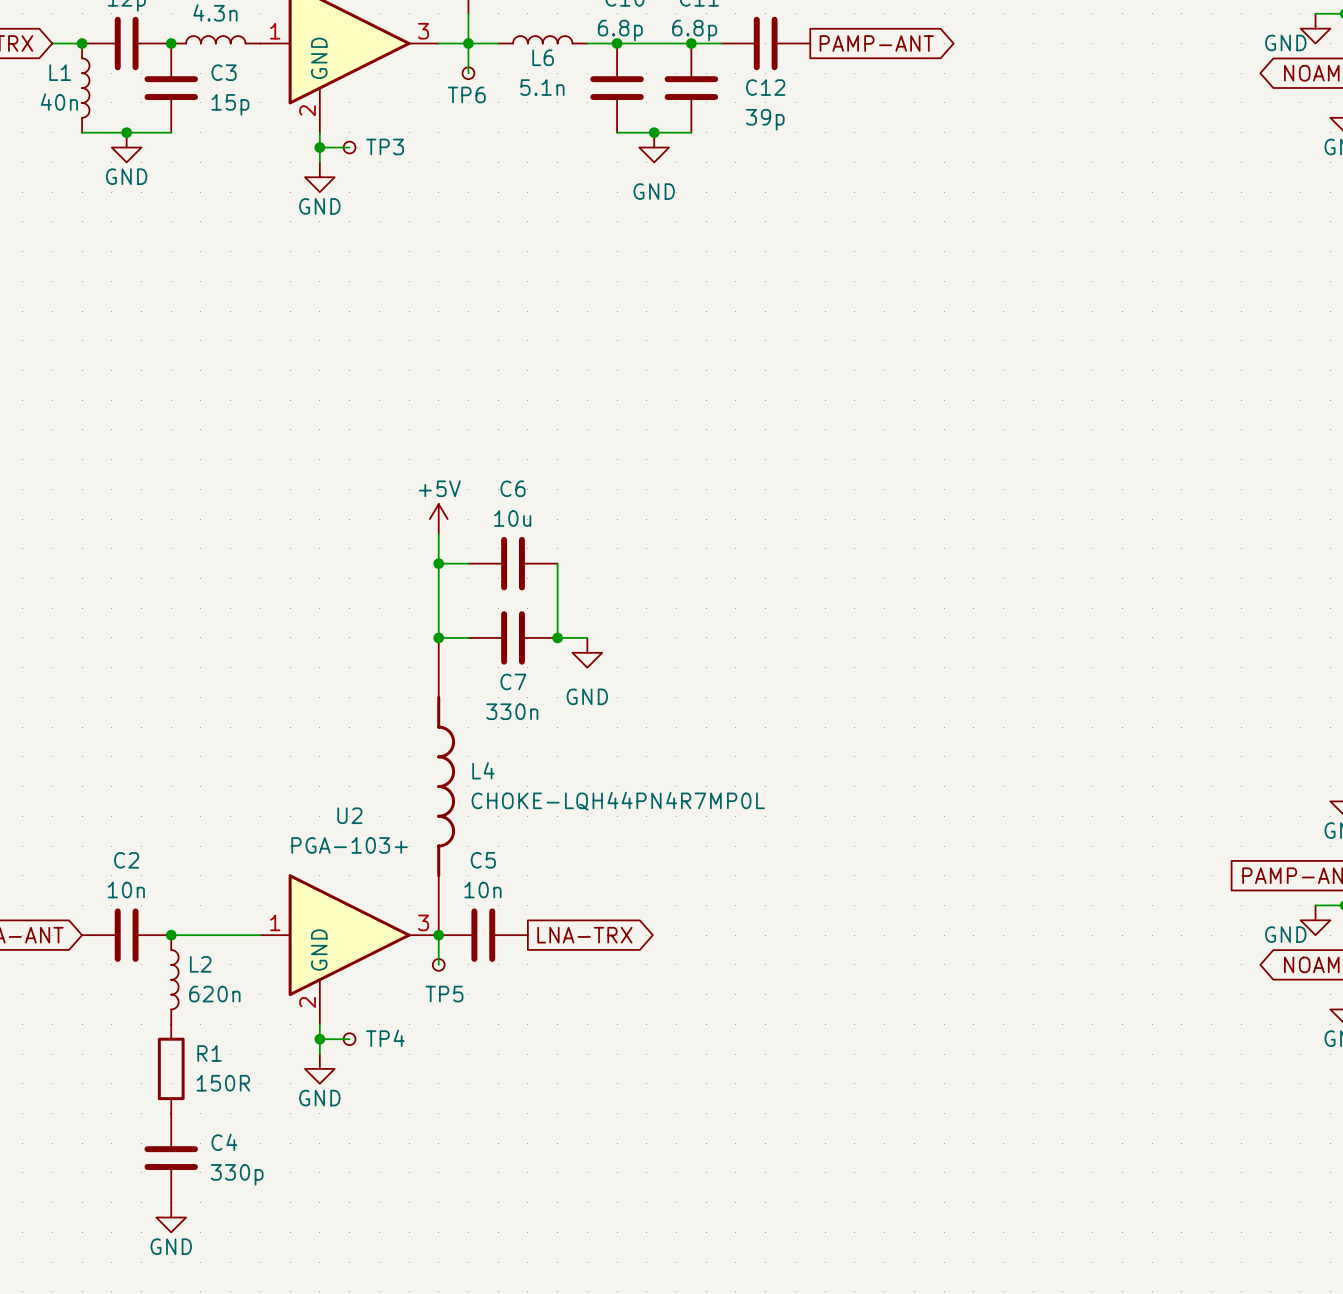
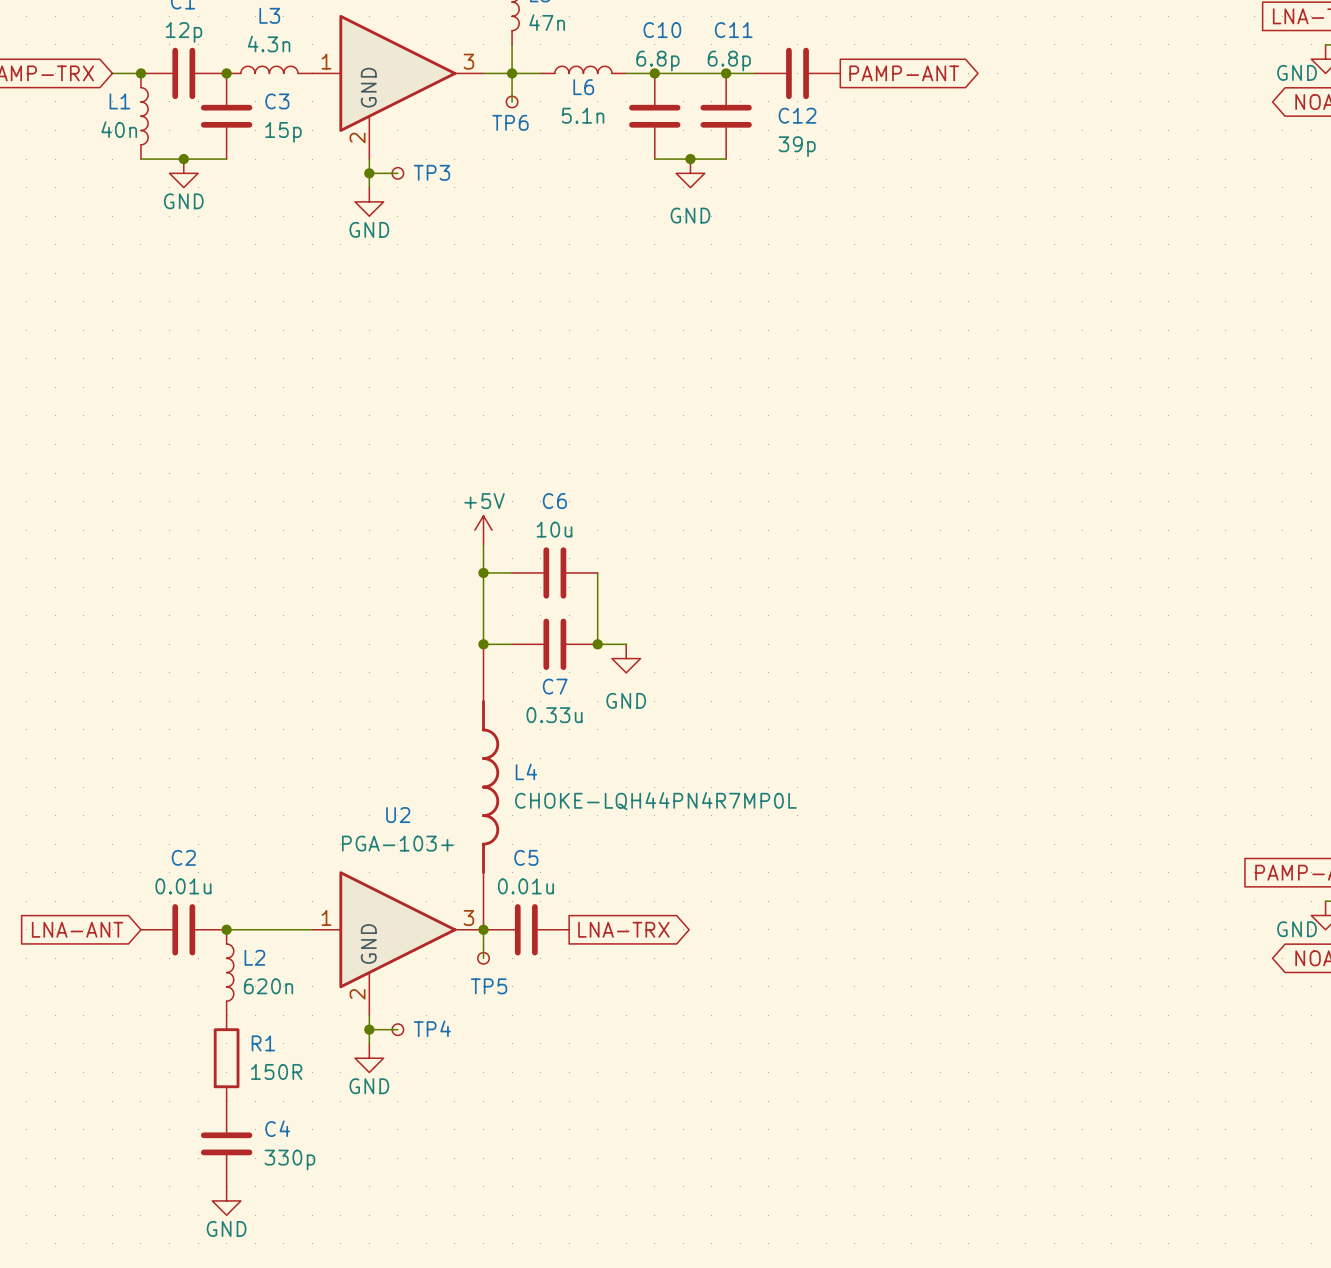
C7 value: 330n (512, 711) -> 0.33u (554, 715)
C2 value: 10n (126, 890) -> 0.01u (183, 886)
C5 value: 10n (482, 890) -> 0.01u (525, 886)

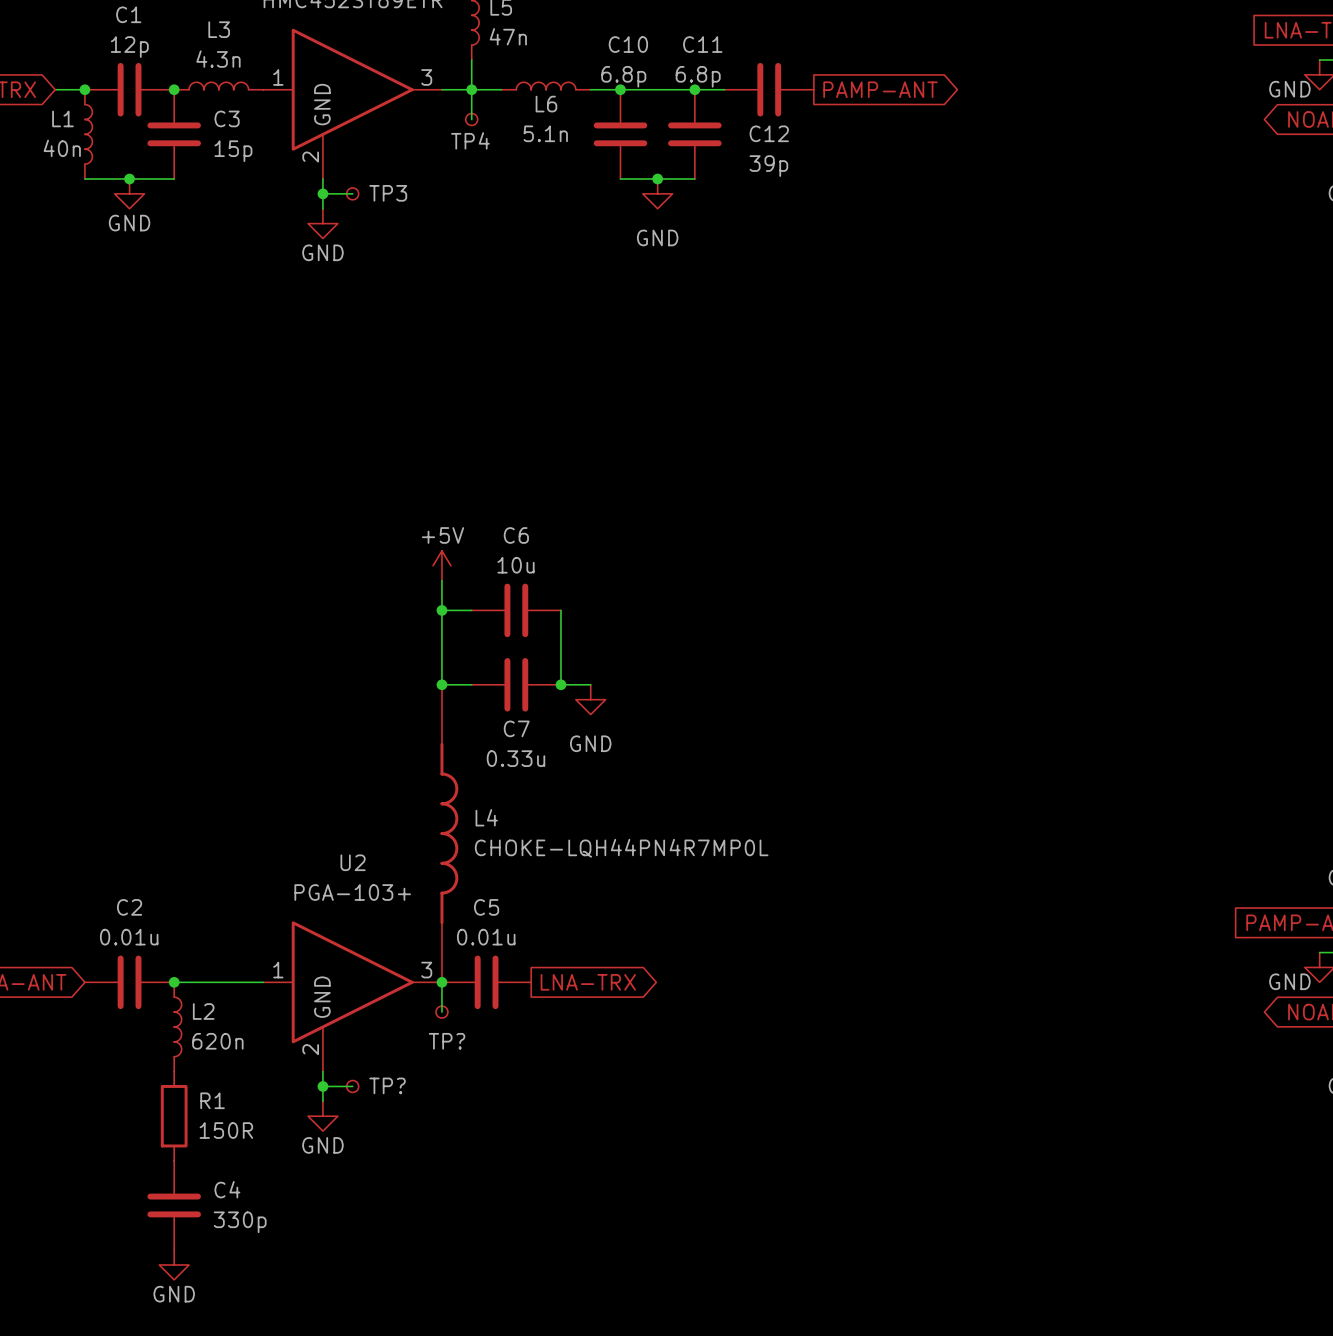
TP6 name: TP6 (510, 122) -> TP4 (470, 140)
TP5 name: TP5 (489, 986) -> TP? (447, 1041)
TP4 name: TP4 (432, 1028) -> TP? (387, 1085)

